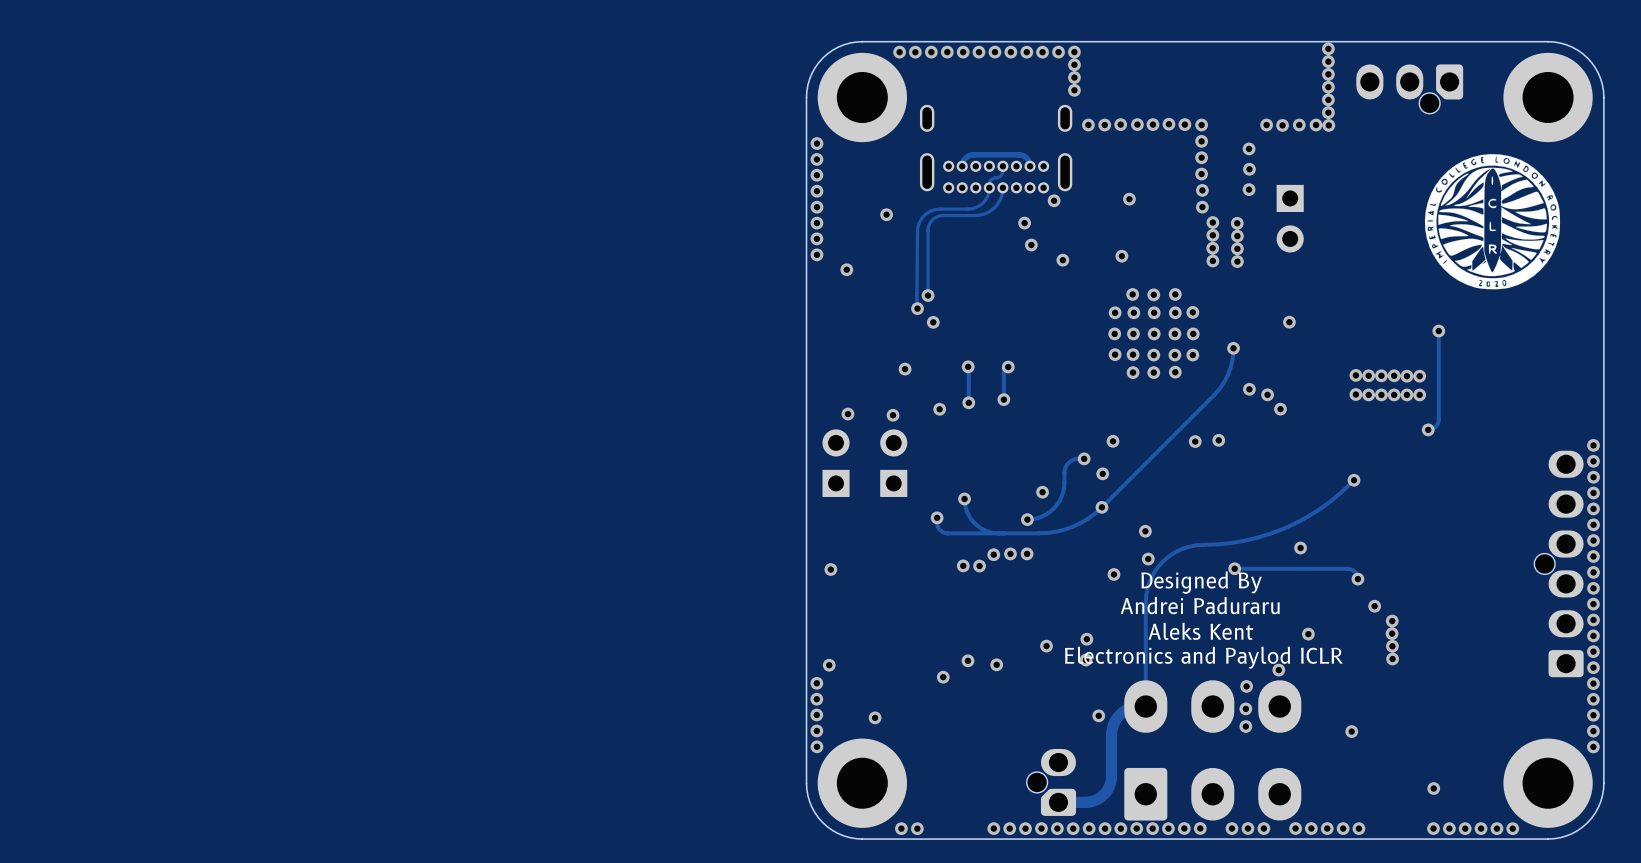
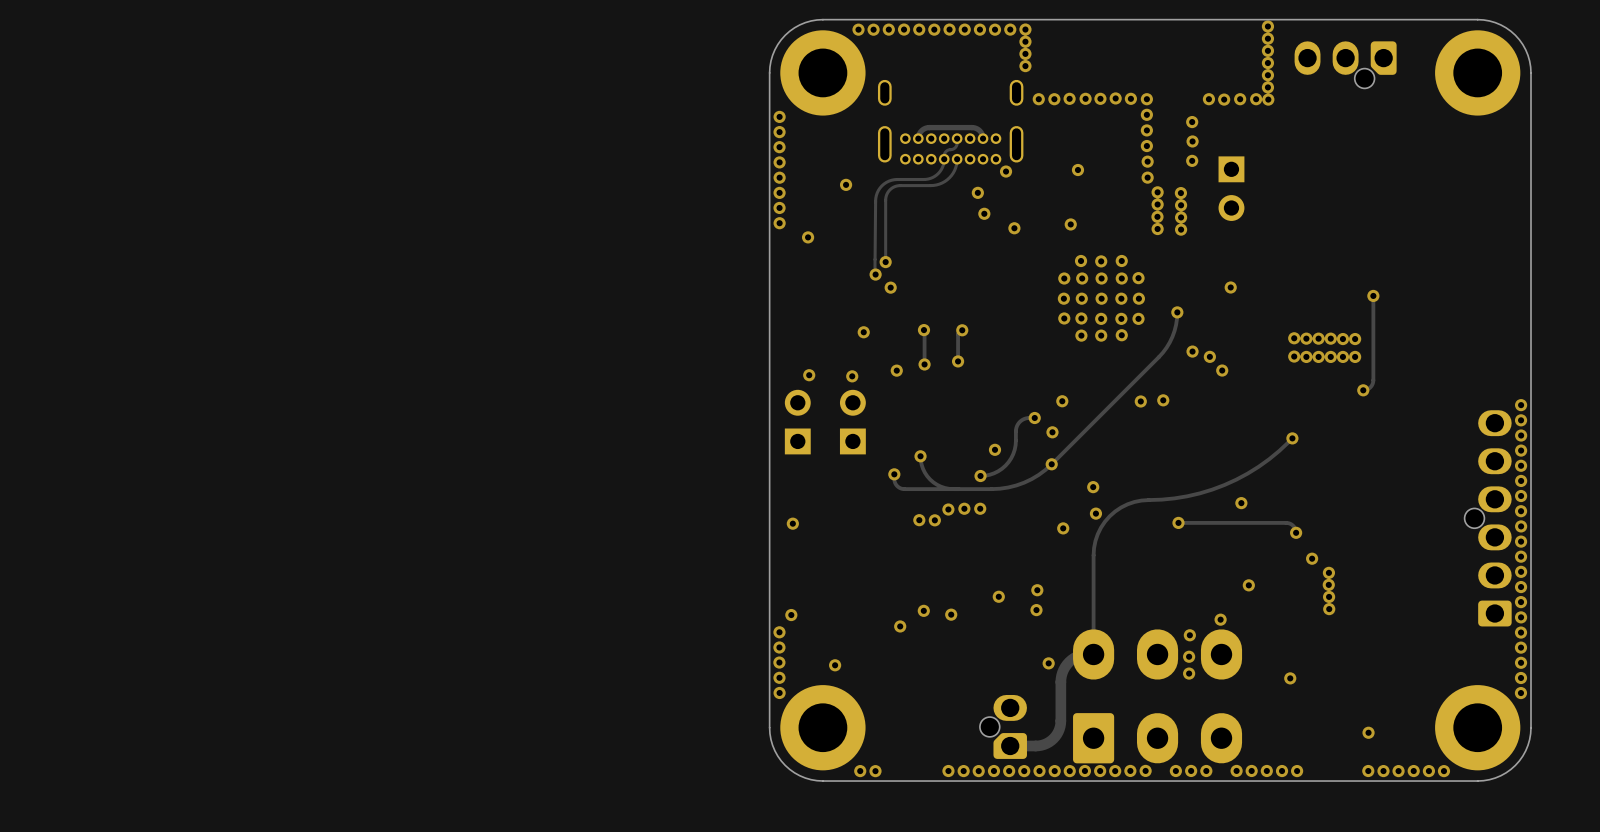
drawing: [1424, 154, 1561, 290] -> none
text: Designed By (1201, 582) -> none
text: Andrei Paduraru (1200, 605) -> none
text: Aleks Kent (1200, 631) -> none
text: Electronics and Paylod ICLR (1203, 657) -> none

